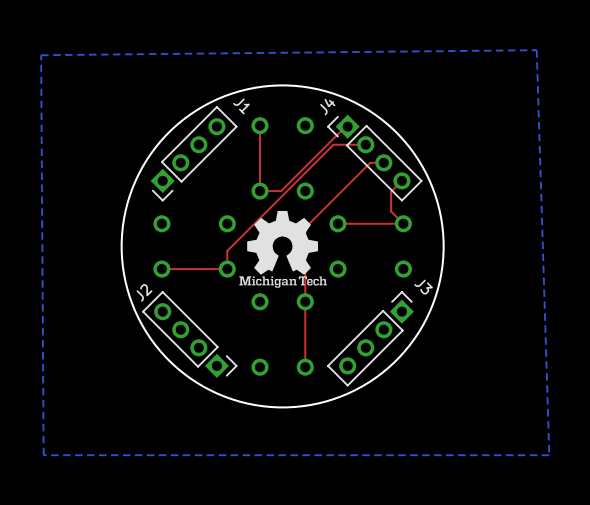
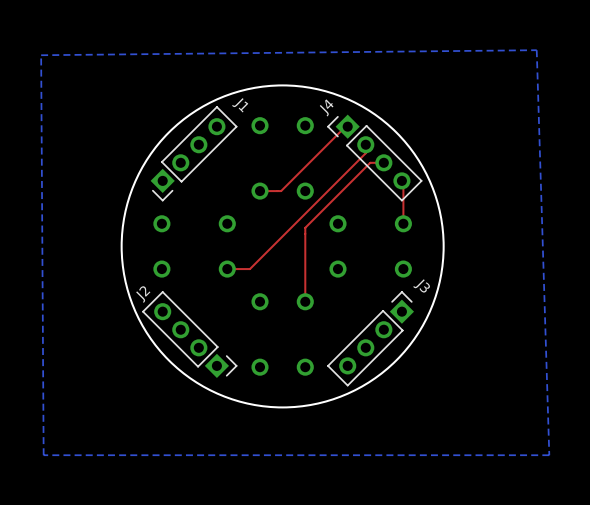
top track: (260, 125) (260, 191) -> none
top track: (365, 144) (333, 144) (227, 250) (227, 269) (161, 269) -> (365, 144) (365, 153) (249, 269) (227, 269)
top track: (401, 180) (391, 191) (391, 211) (403, 223) (337, 223) -> (401, 180) (403, 223)
drawing: [239, 210, 327, 288] -> none
top track: (305, 301) (305, 367) -> none

